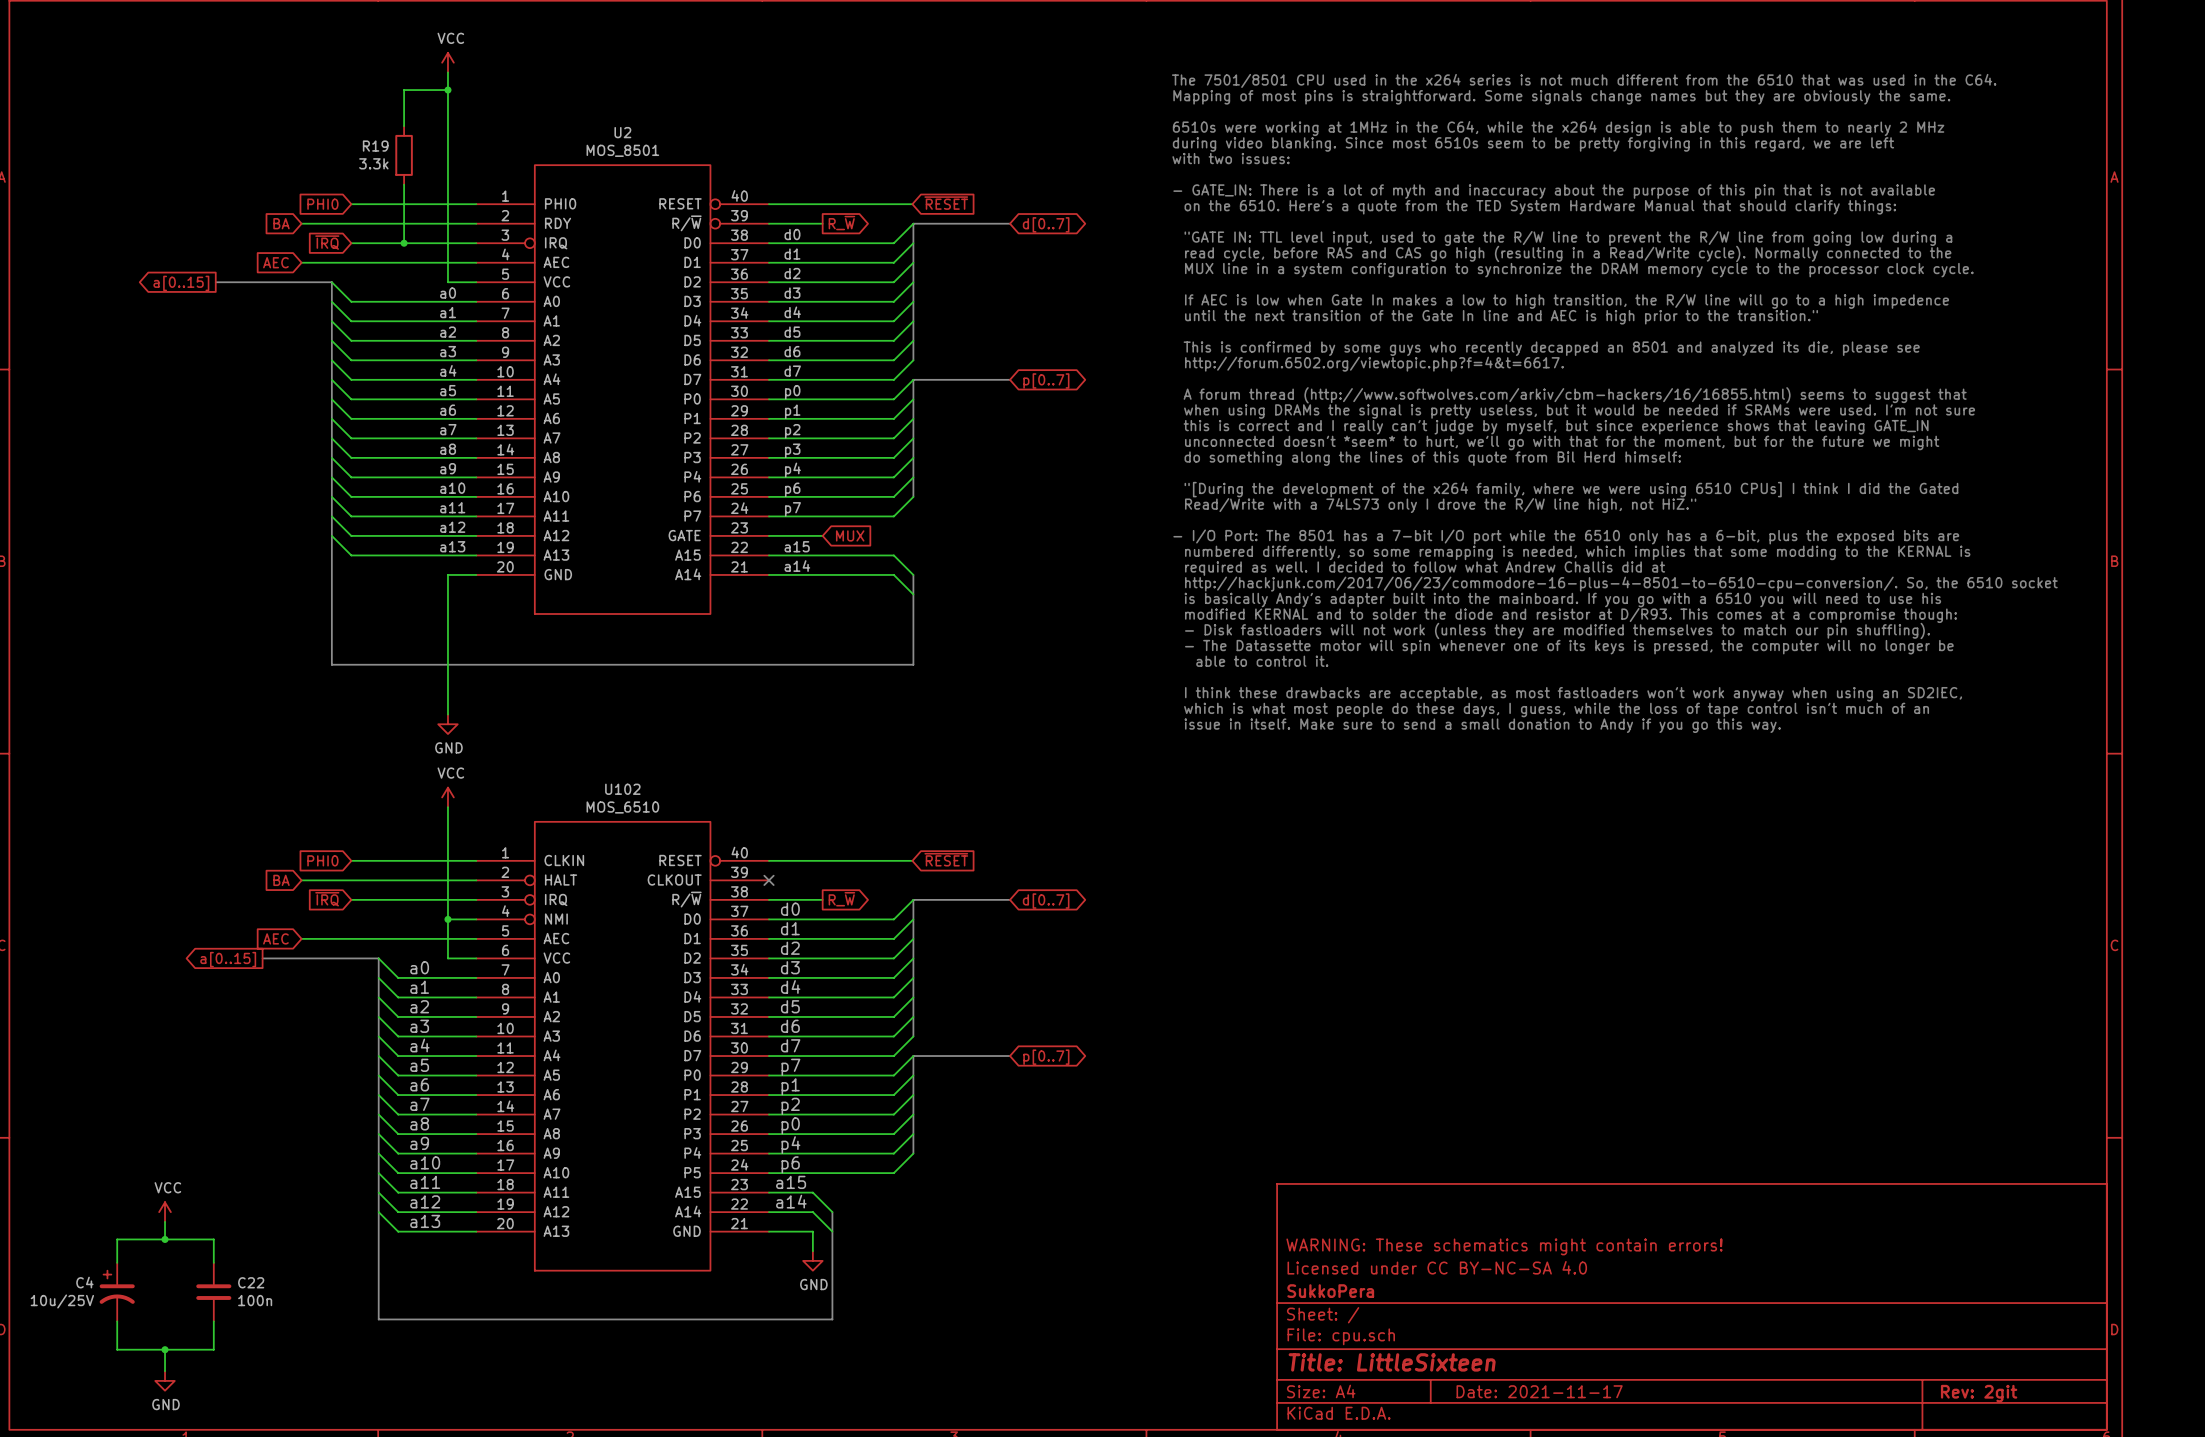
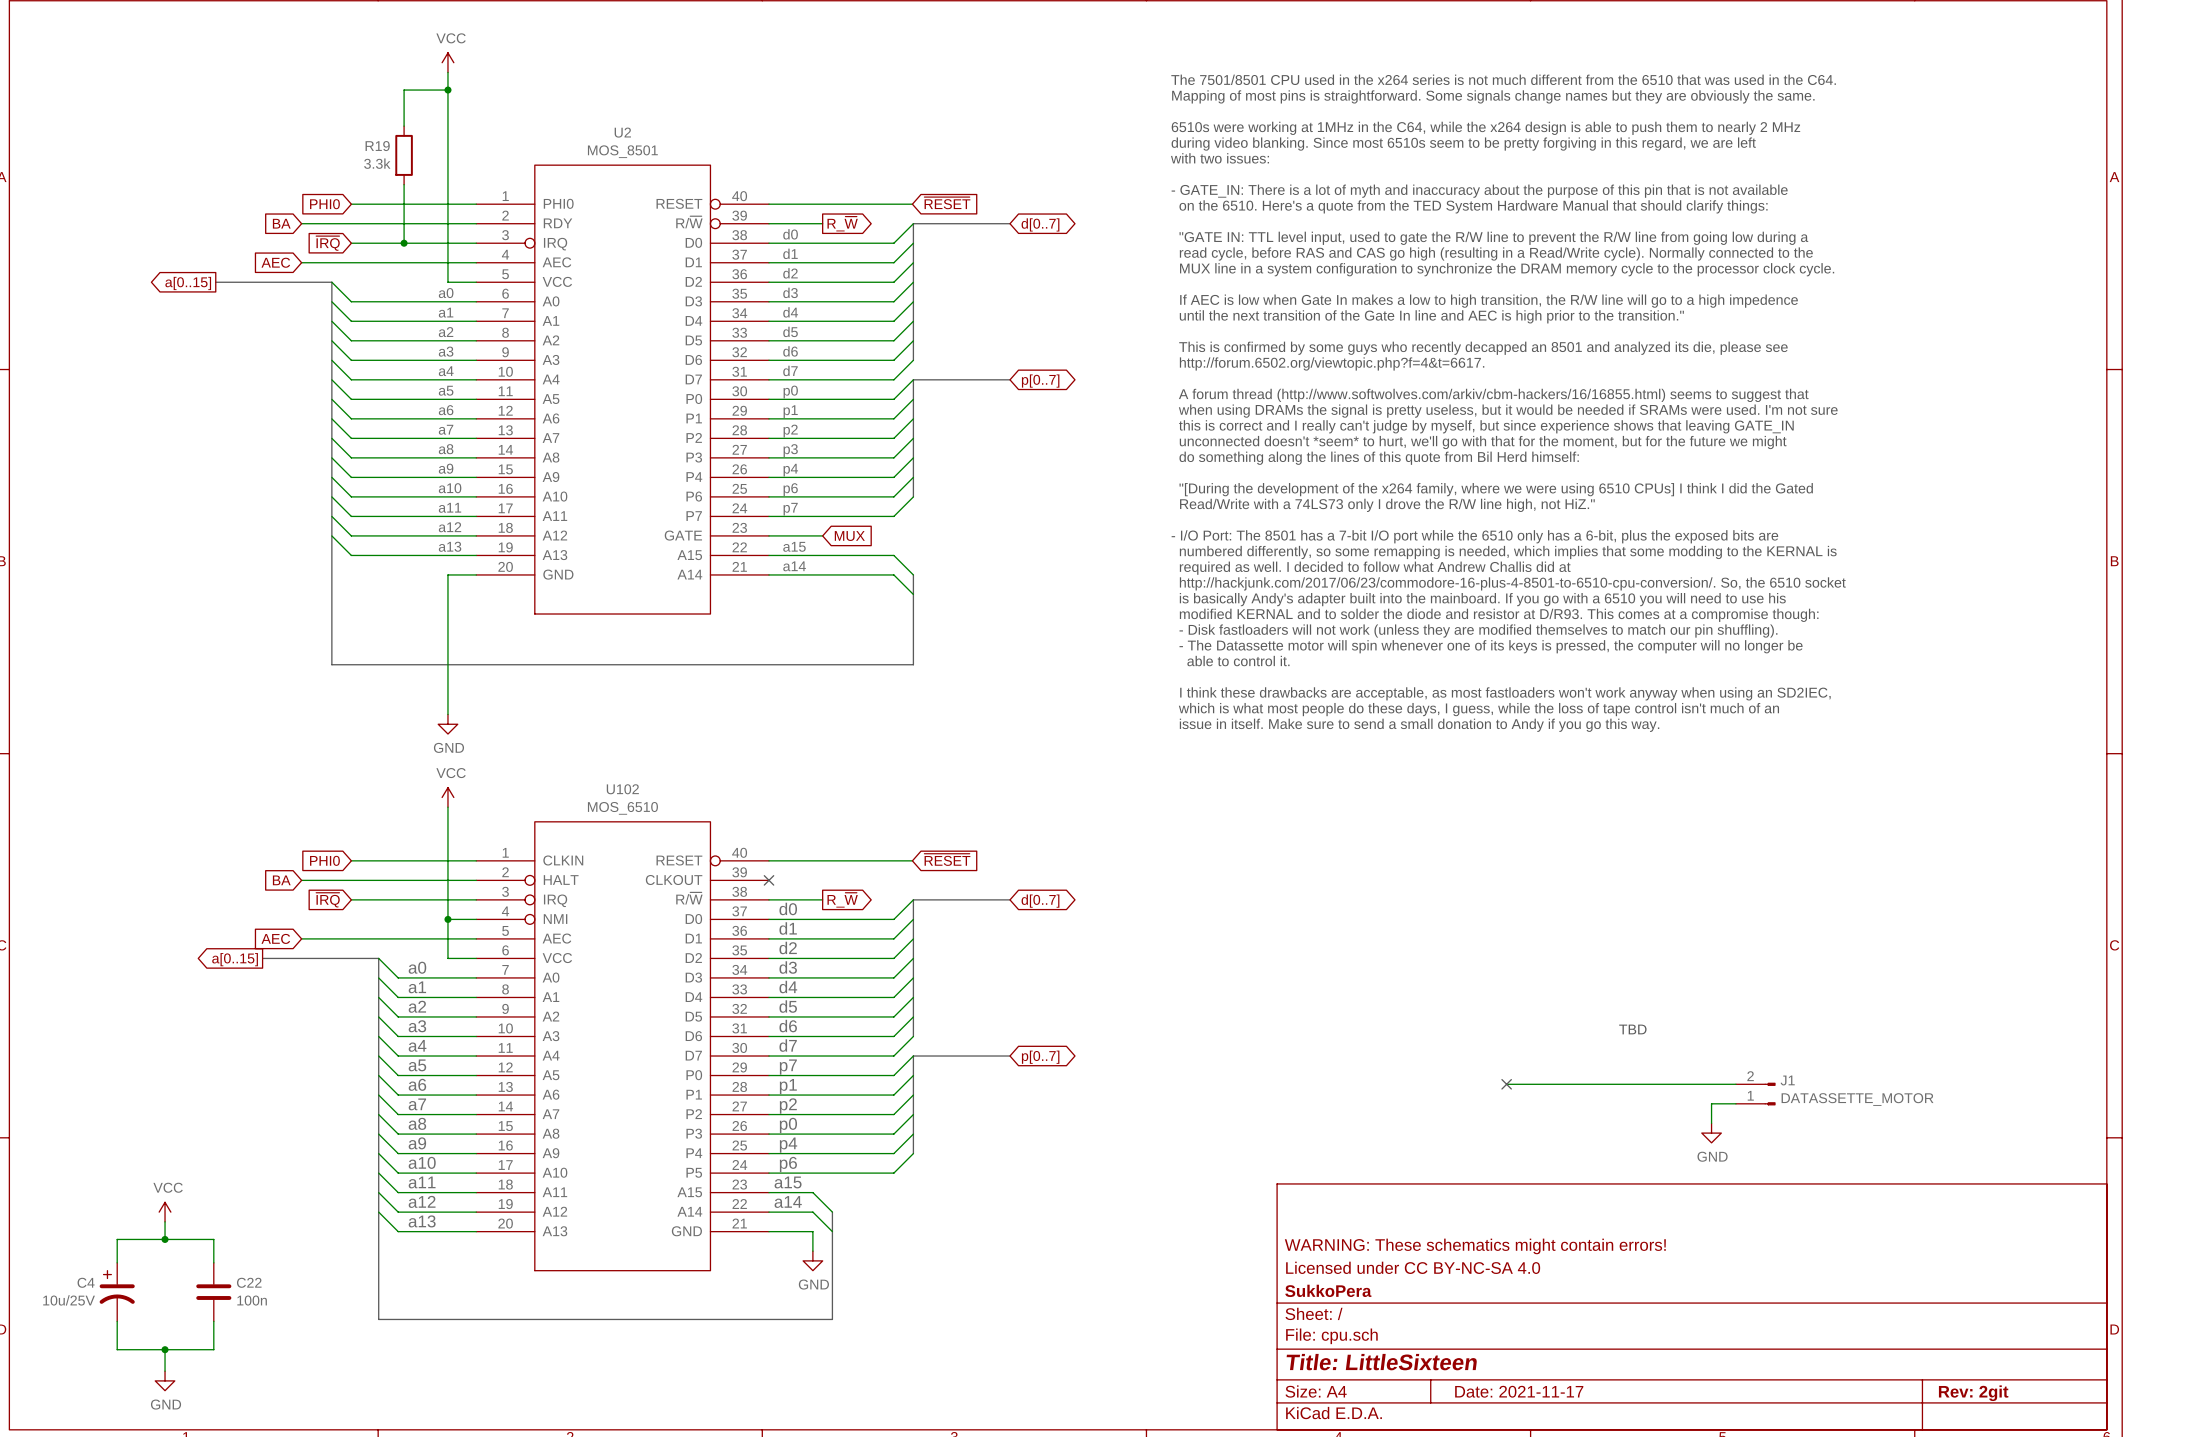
text: none -> TBD (1632, 1029)
wire: none -> (1506, 1084) (1735, 1084)
no-connect mark: none -> (1506, 1084)
J1: none -> DATASSETTE_MOTOR (1755, 1094)
wire: none -> (1735, 1103) (1711, 1103) (1711, 1123)
power symbol: none -> GND (1711, 1133)

